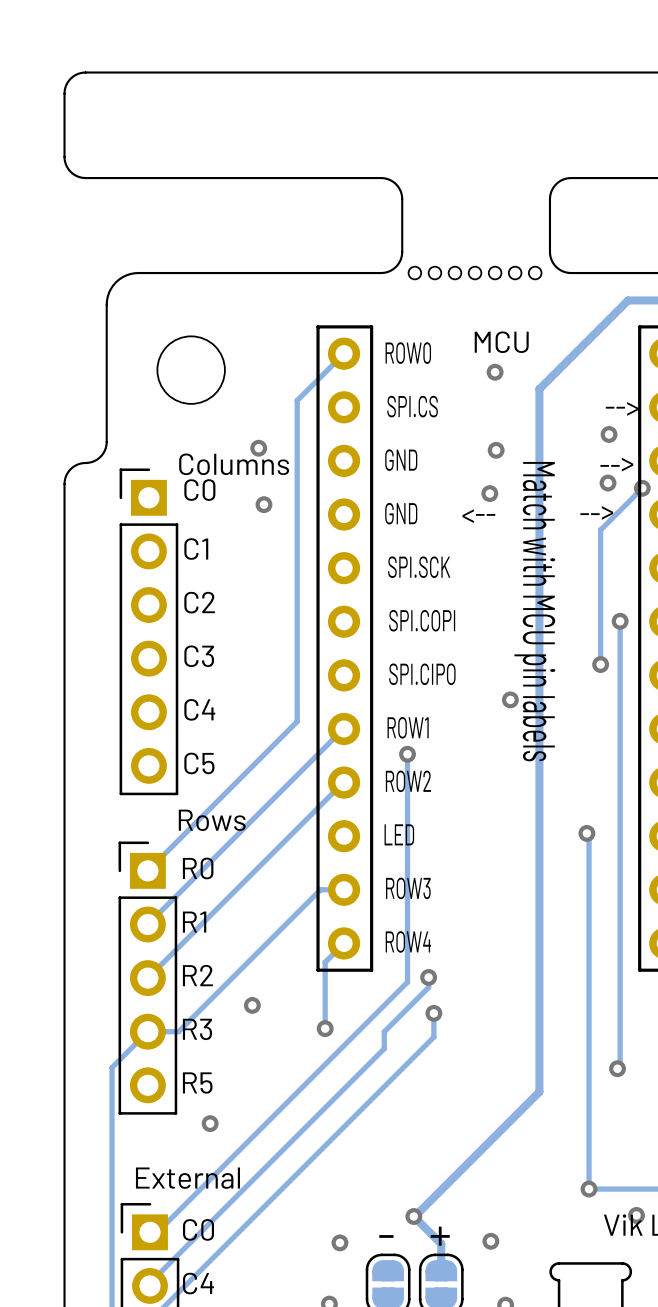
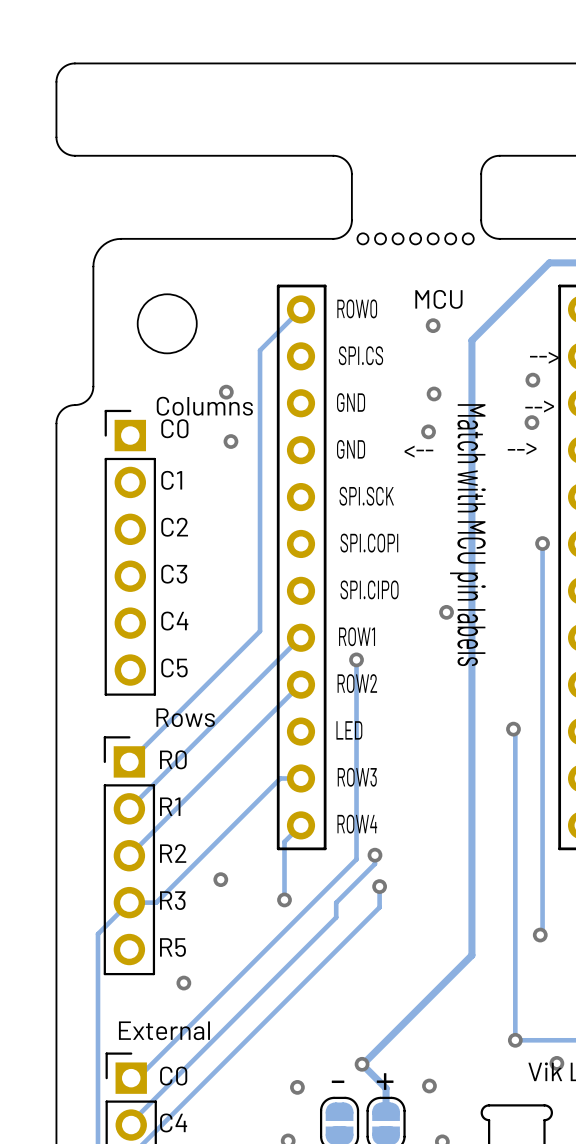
track: (642, 488) (600, 530) (600, 664) -> none
via: (642, 488) -> none
via: (600, 664) -> none

